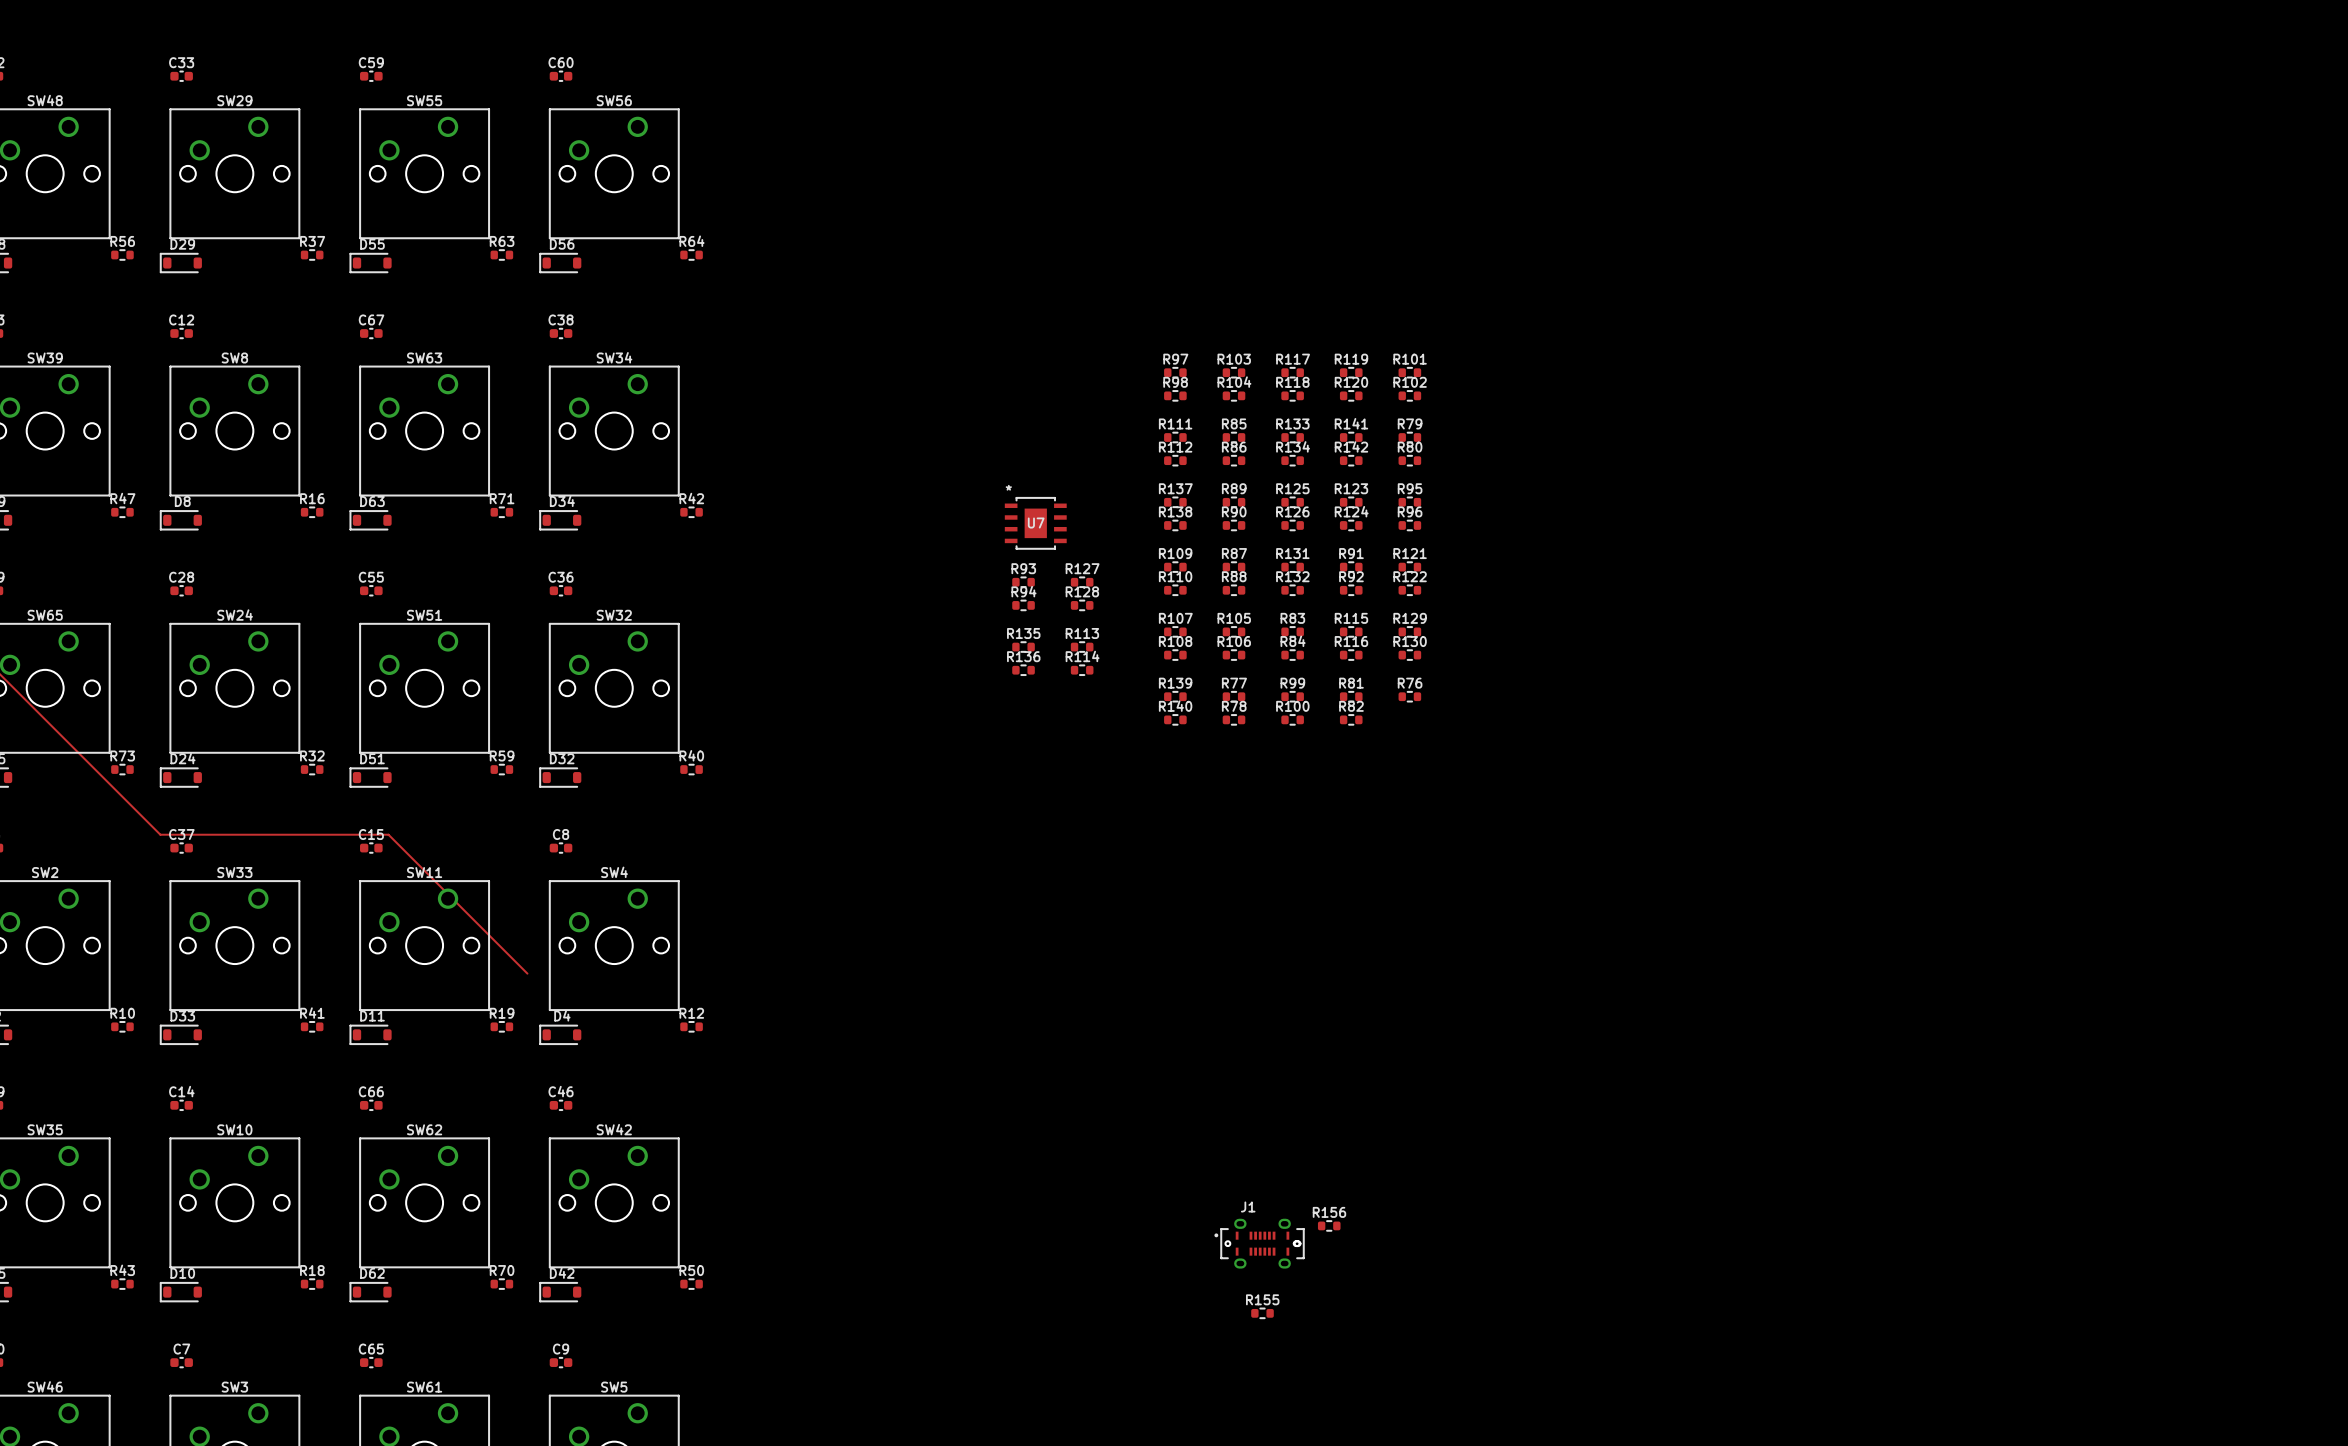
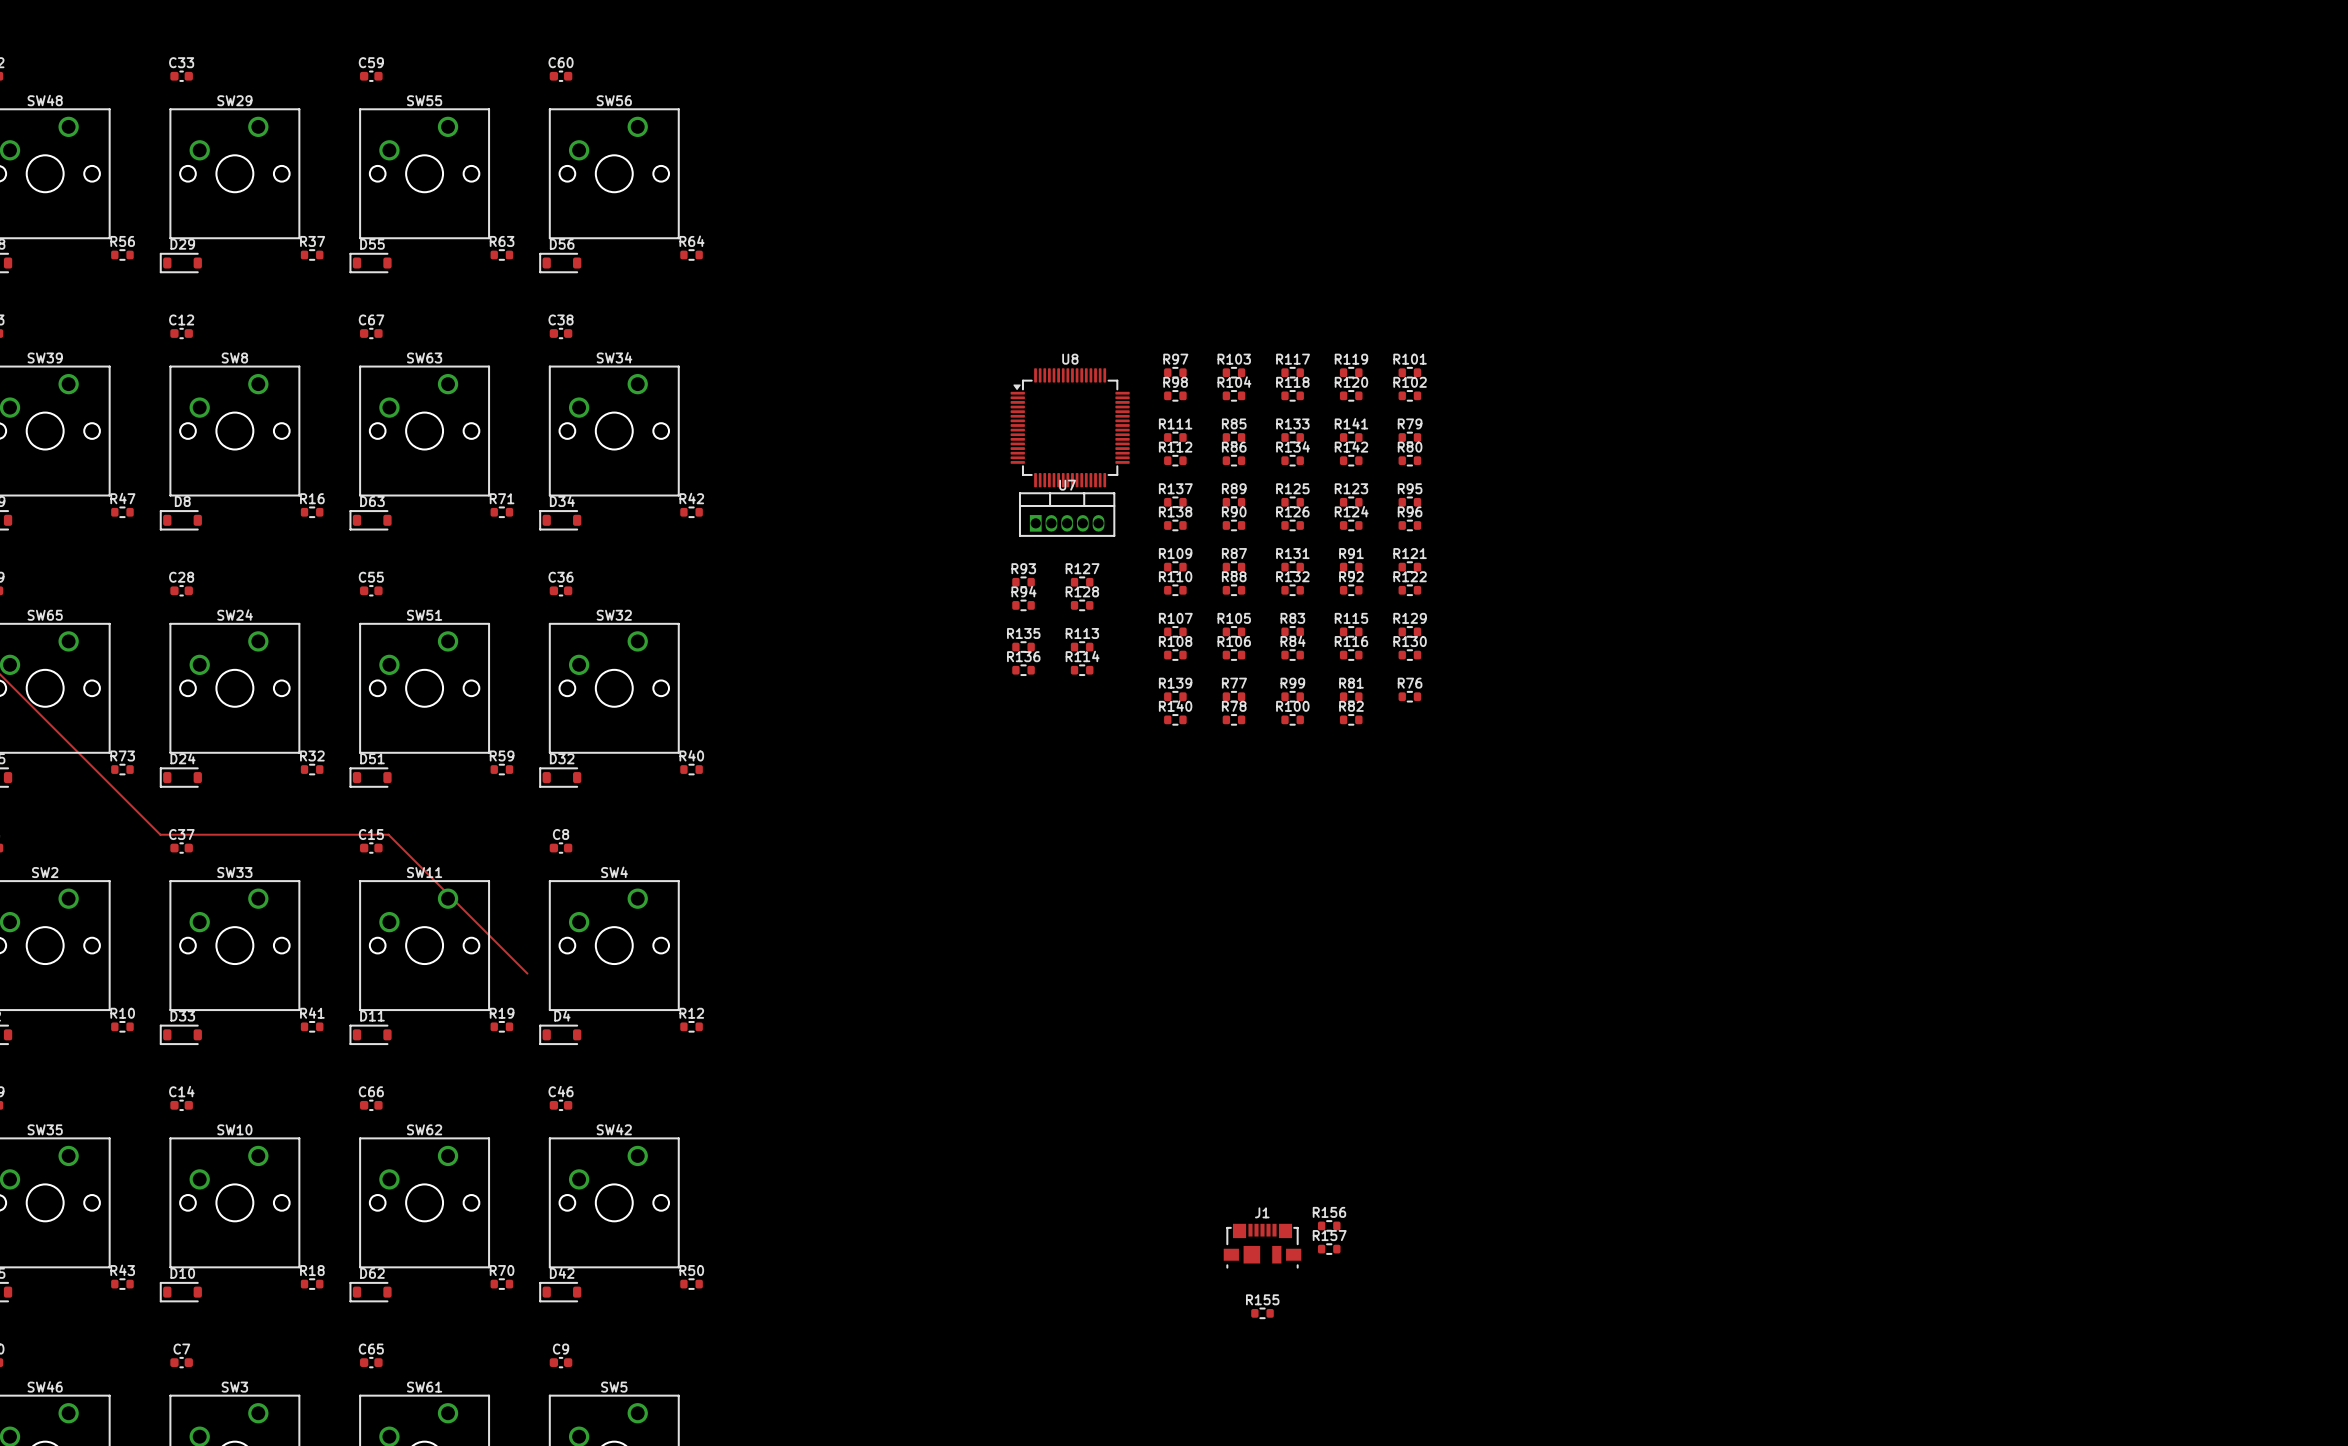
U8: none -> (1070, 427)
U7 footprint: [1004, 497, 1067, 550] -> [1019, 492, 1115, 537]
U7 name position: U7 (1036, 523) -> U7 (1067, 485)
J1 footprint: [1214, 1218, 1305, 1269] -> [1223, 1223, 1302, 1269]
R157: none -> (1329, 1249)

